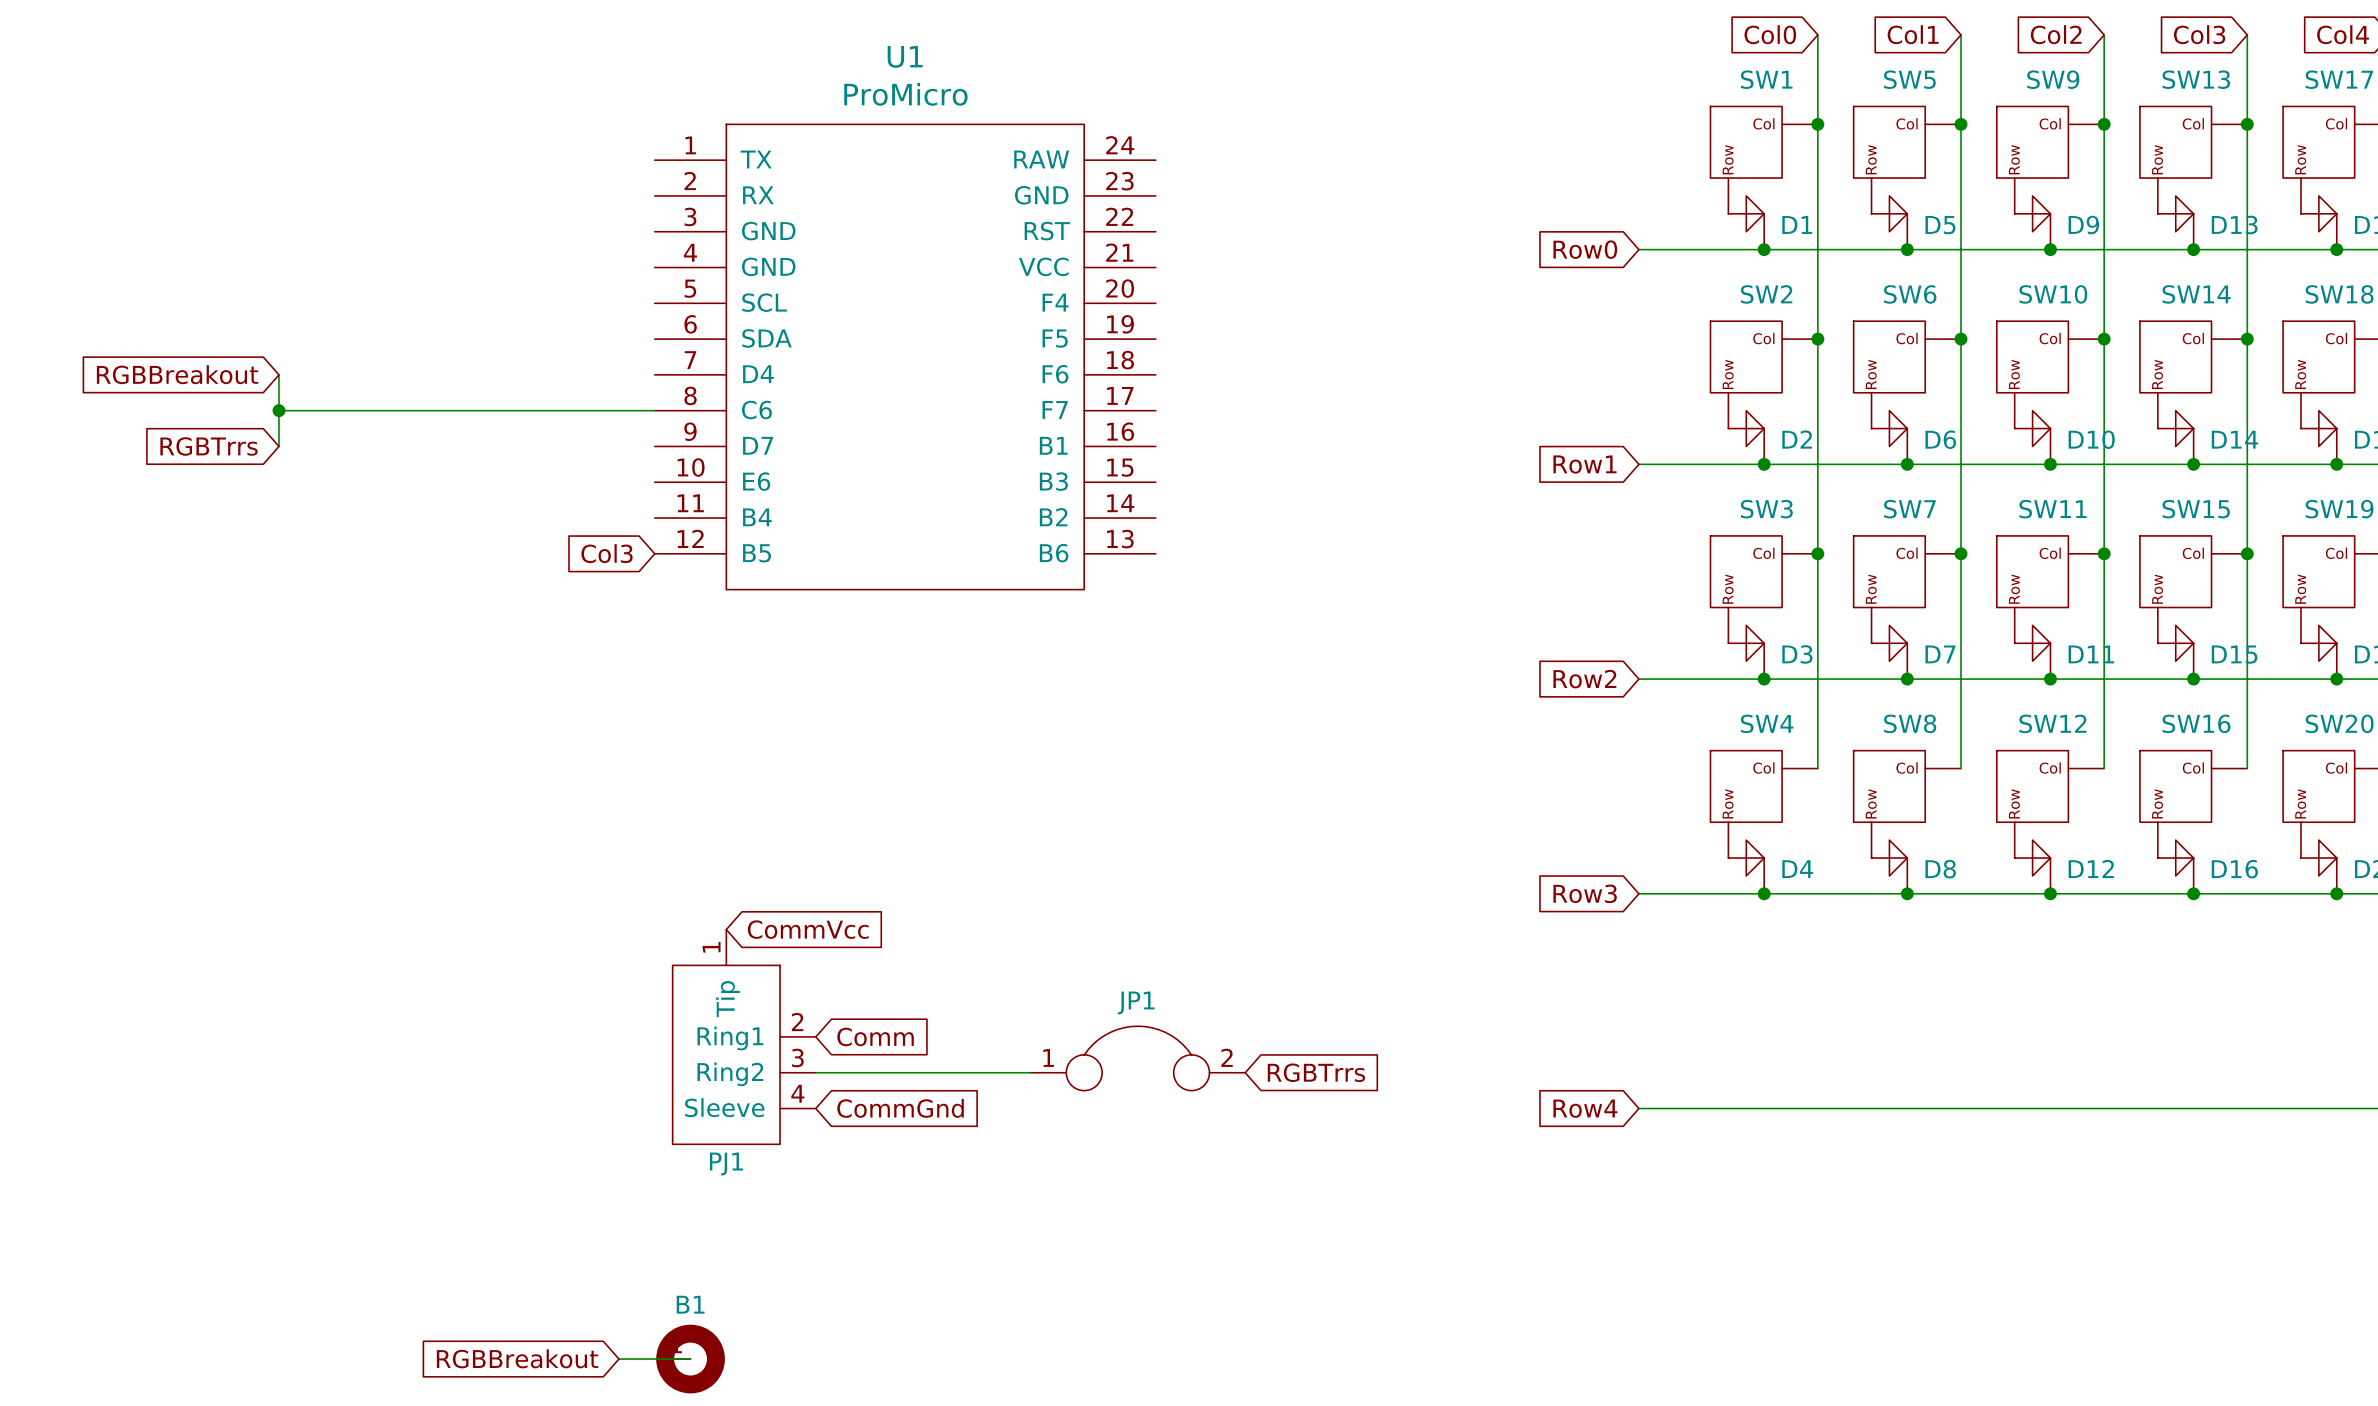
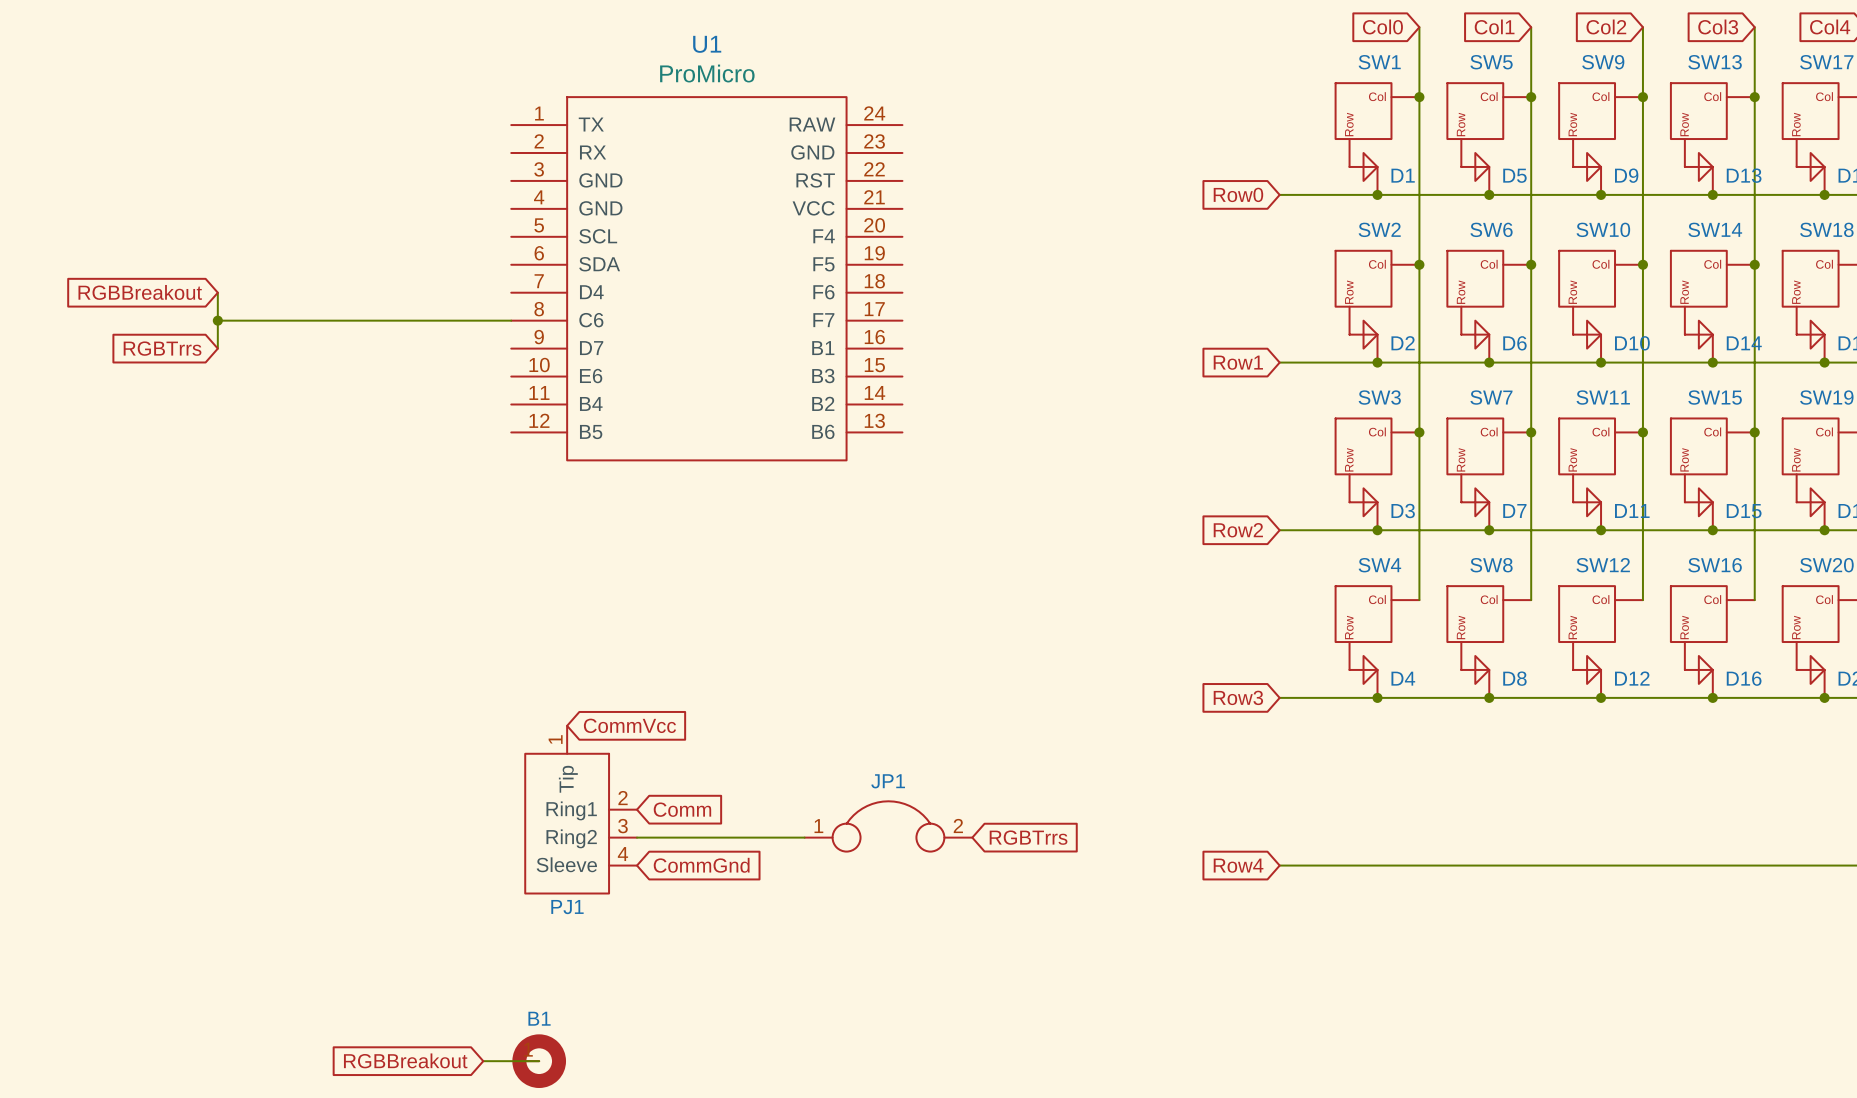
global label: Col3 (607, 553) -> none

